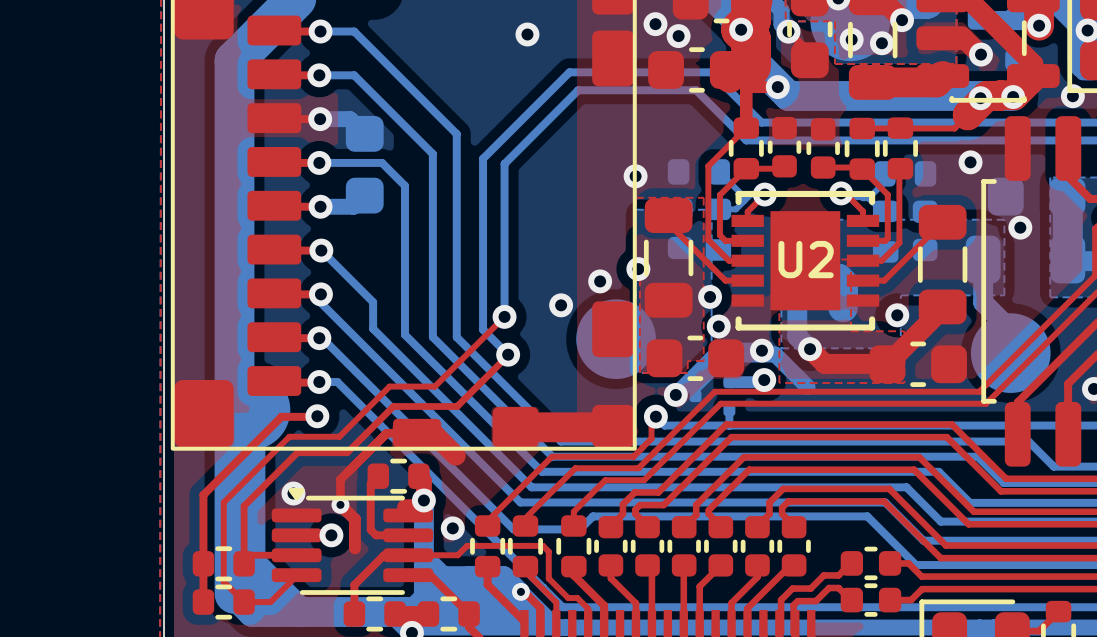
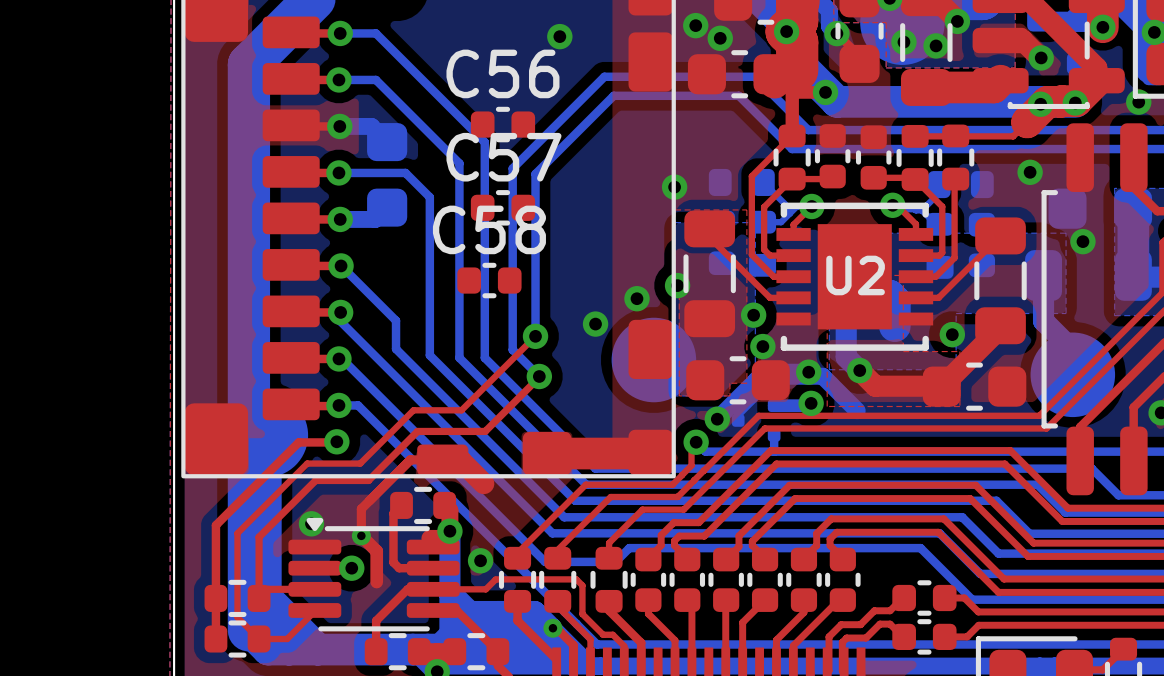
C56: none -> (502, 124)
C57: none -> (502, 207)
C58: none -> (489, 280)

